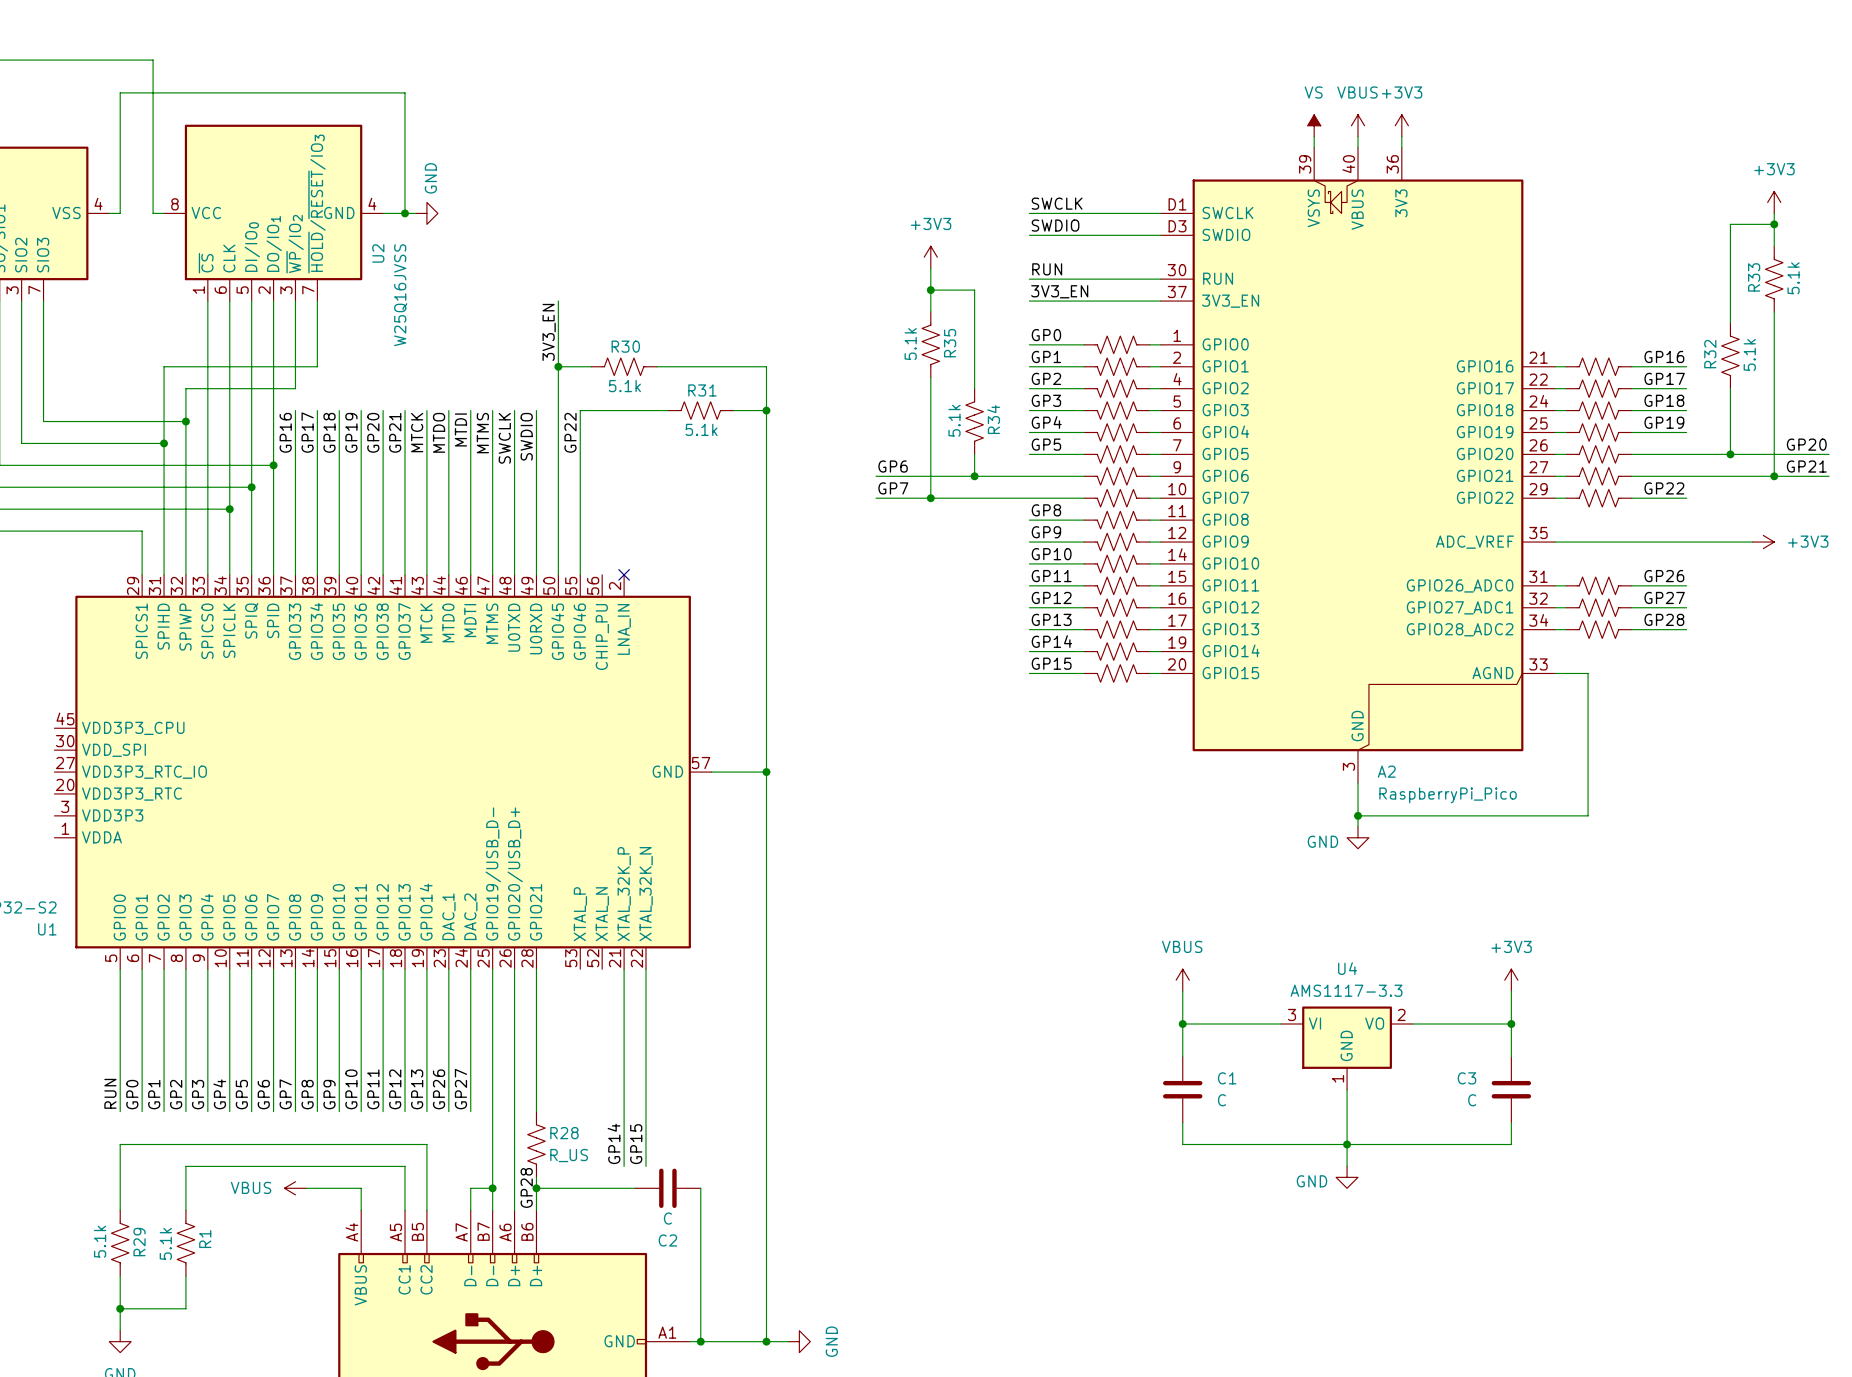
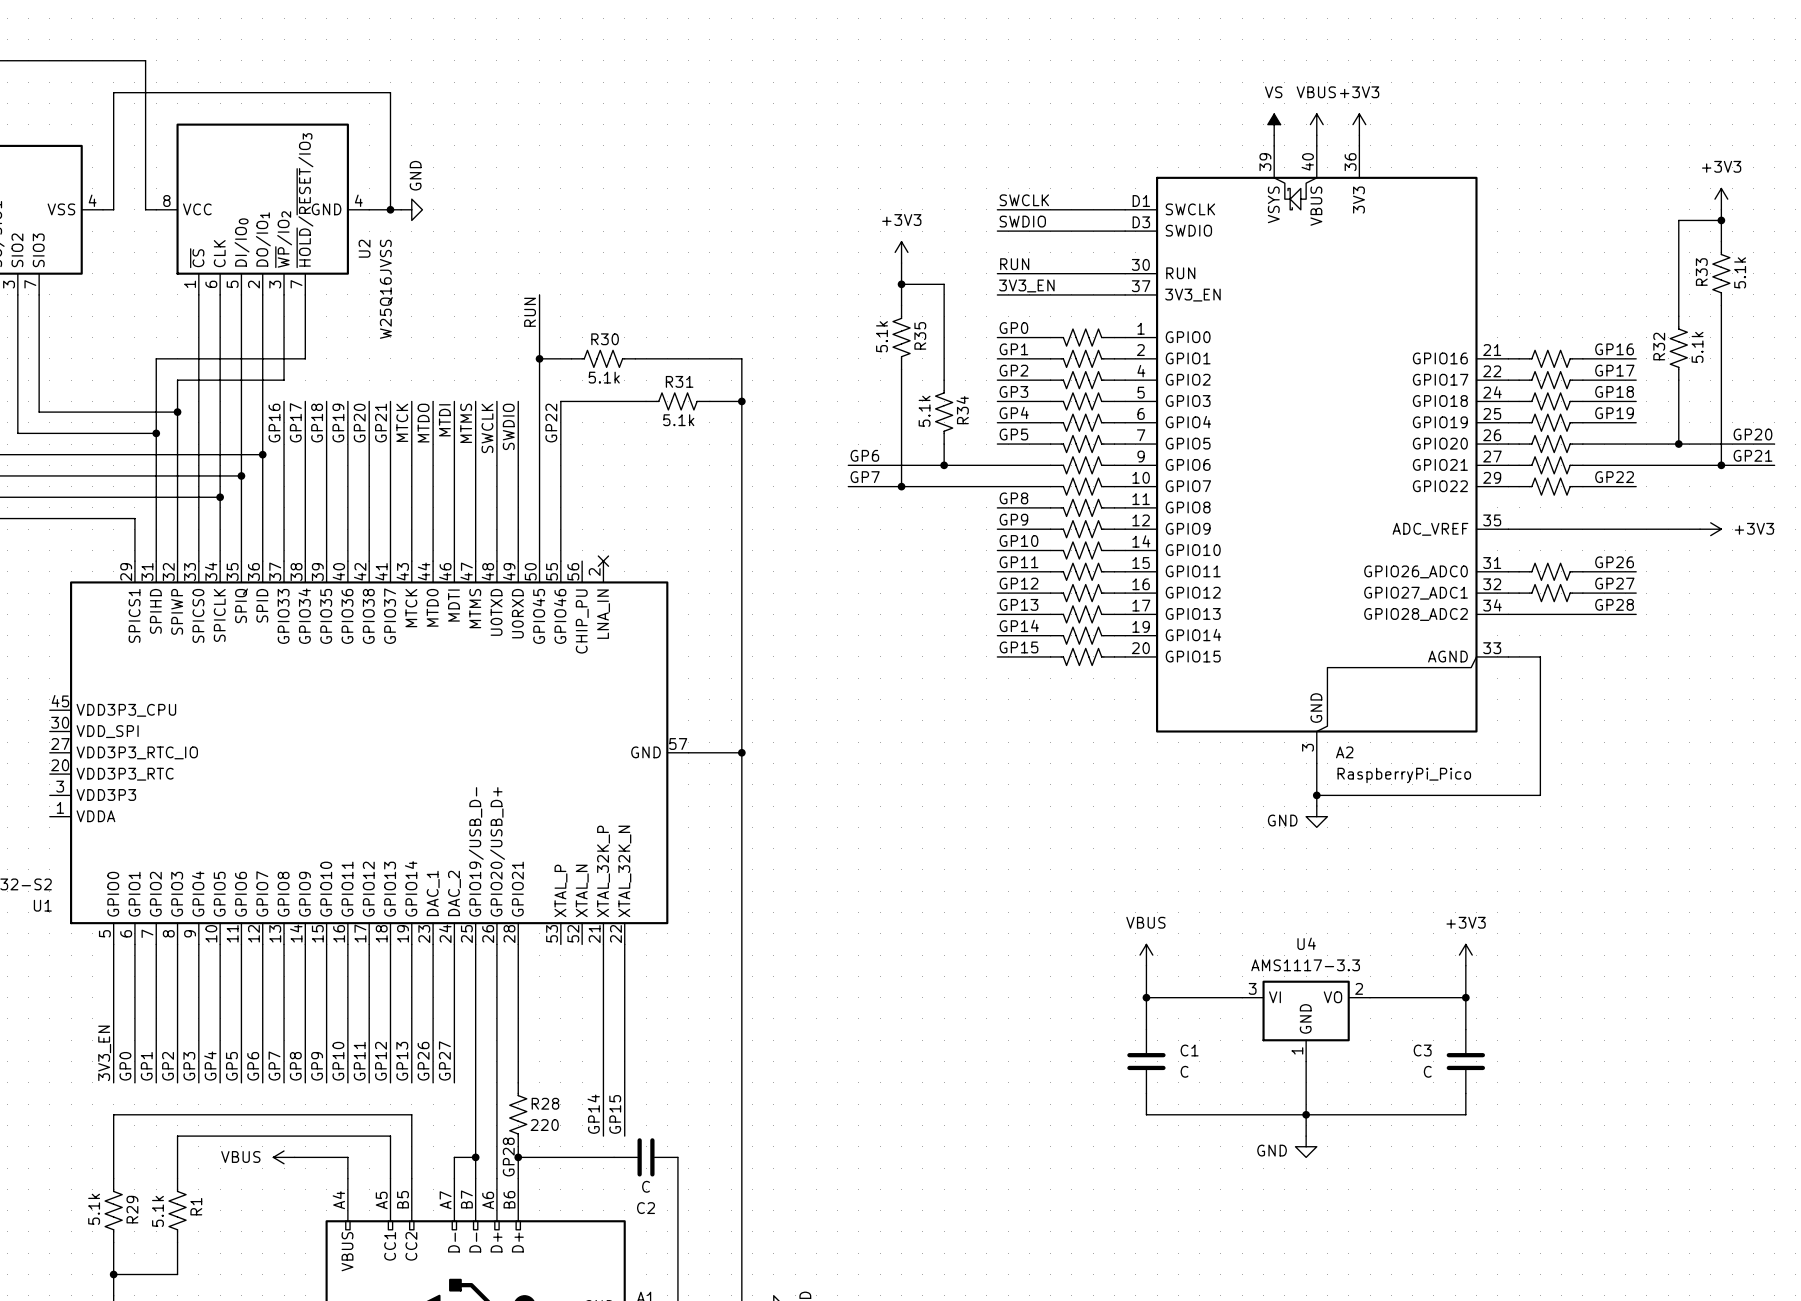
label: 3V3_EN (549, 332) -> RUN (530, 312)
part: (1598, 629) -> none
label: RUN (110, 1093) -> 3V3_EN (104, 1053)
R28 value: R_US (569, 1155) -> 220 (544, 1125)

